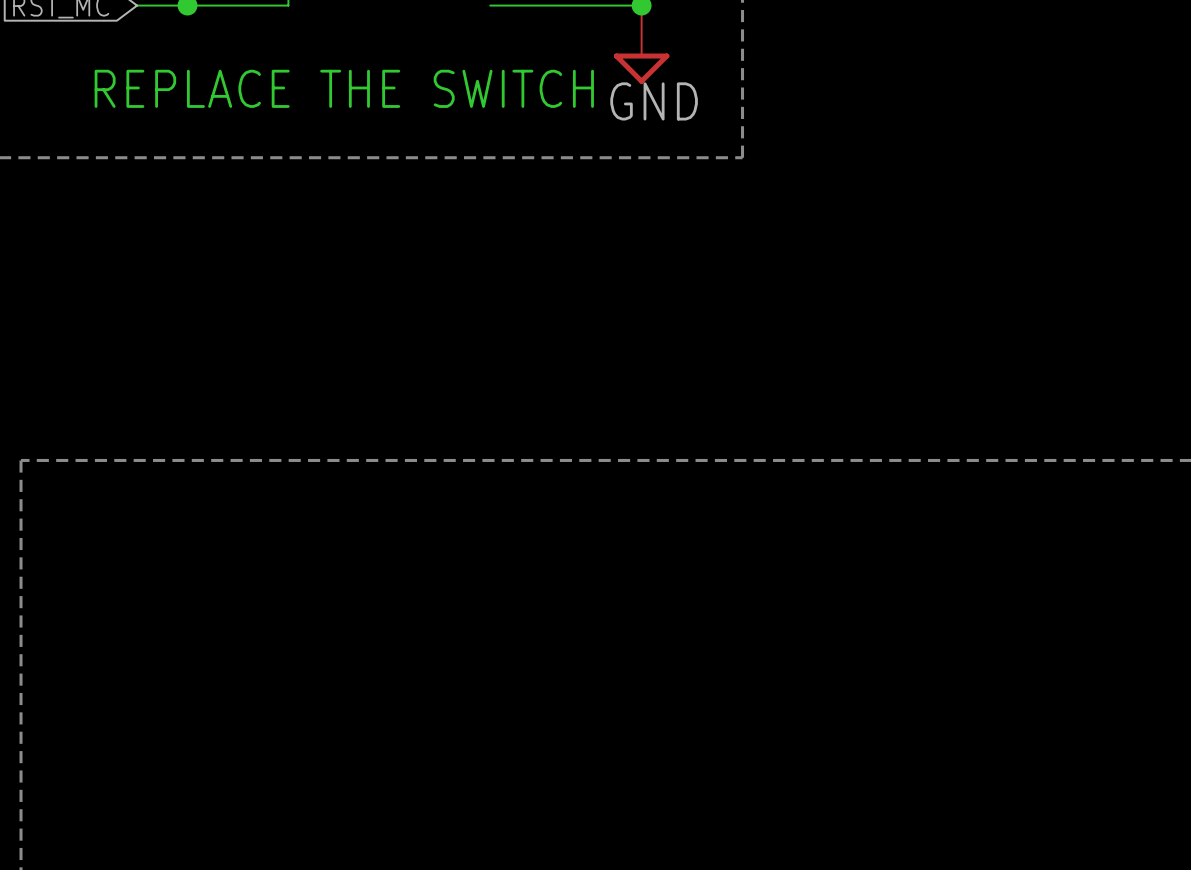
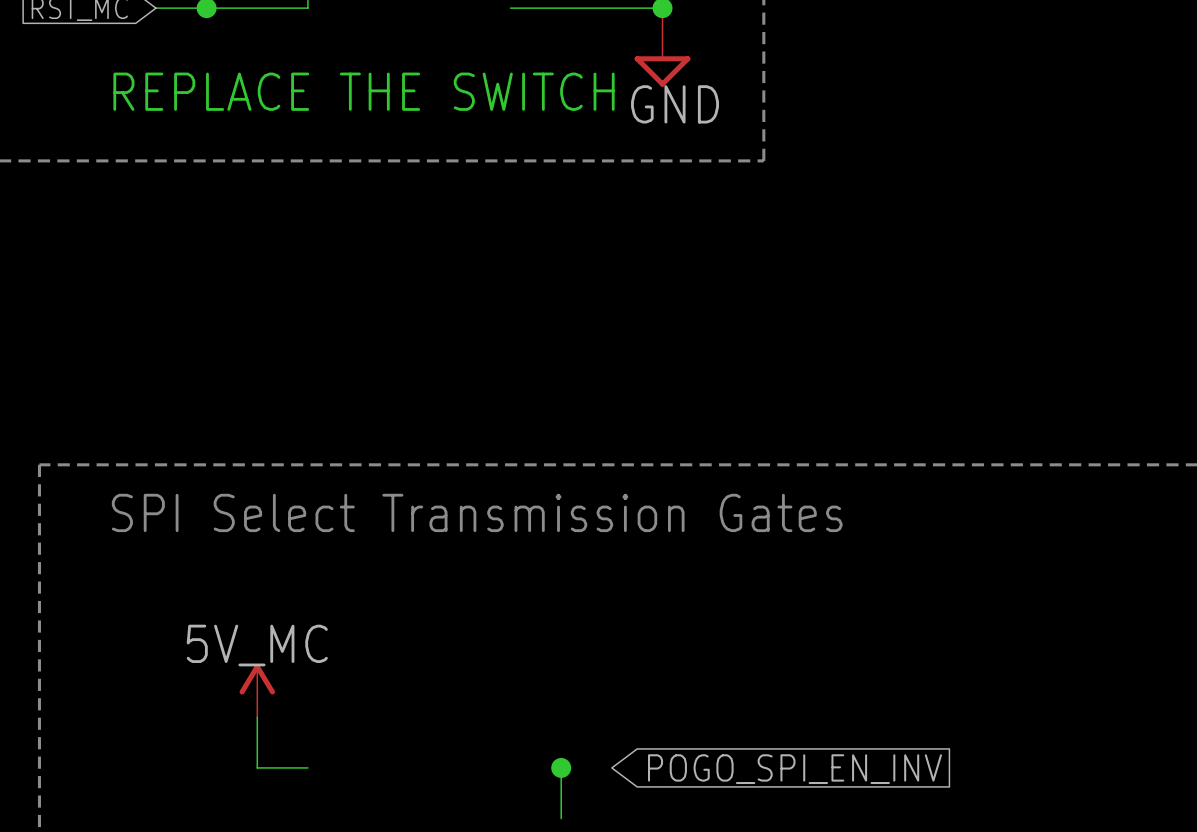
text: none -> SPI Select Transmission Gates (477, 512)
power symbol: none -> 5V_MC (257, 690)
wire: none -> (257, 717) (257, 767) (307, 767)
wire: none -> (561, 767) (561, 818)
junction: none -> (561, 767)
global label: none -> POGO_SPI_EN_INV (795, 769)

